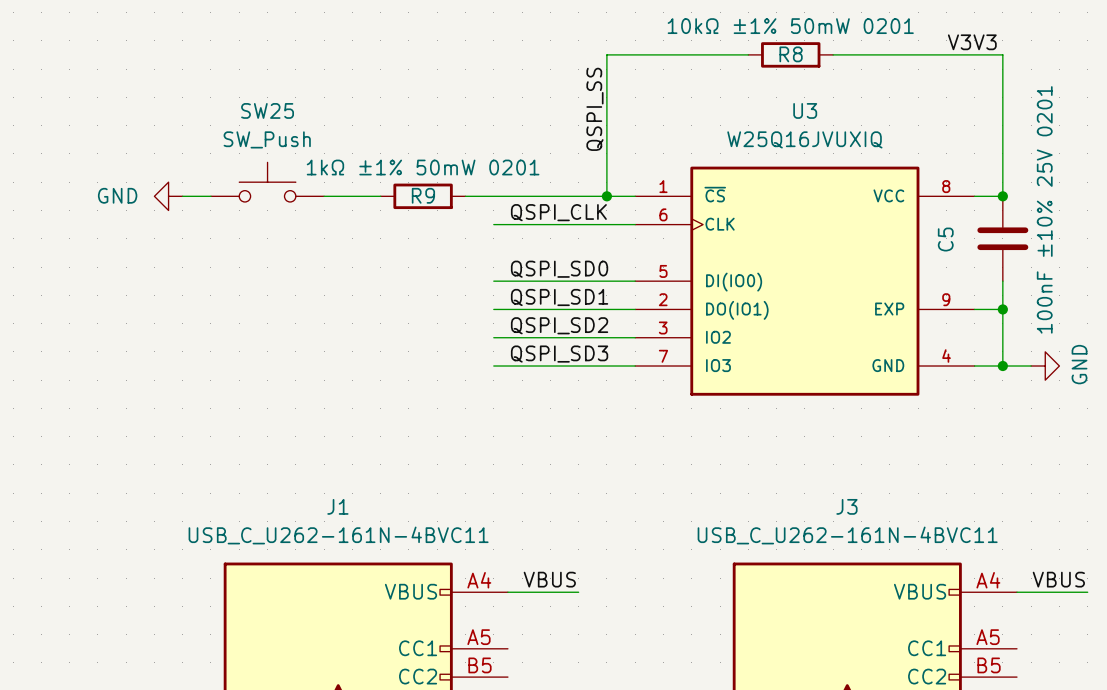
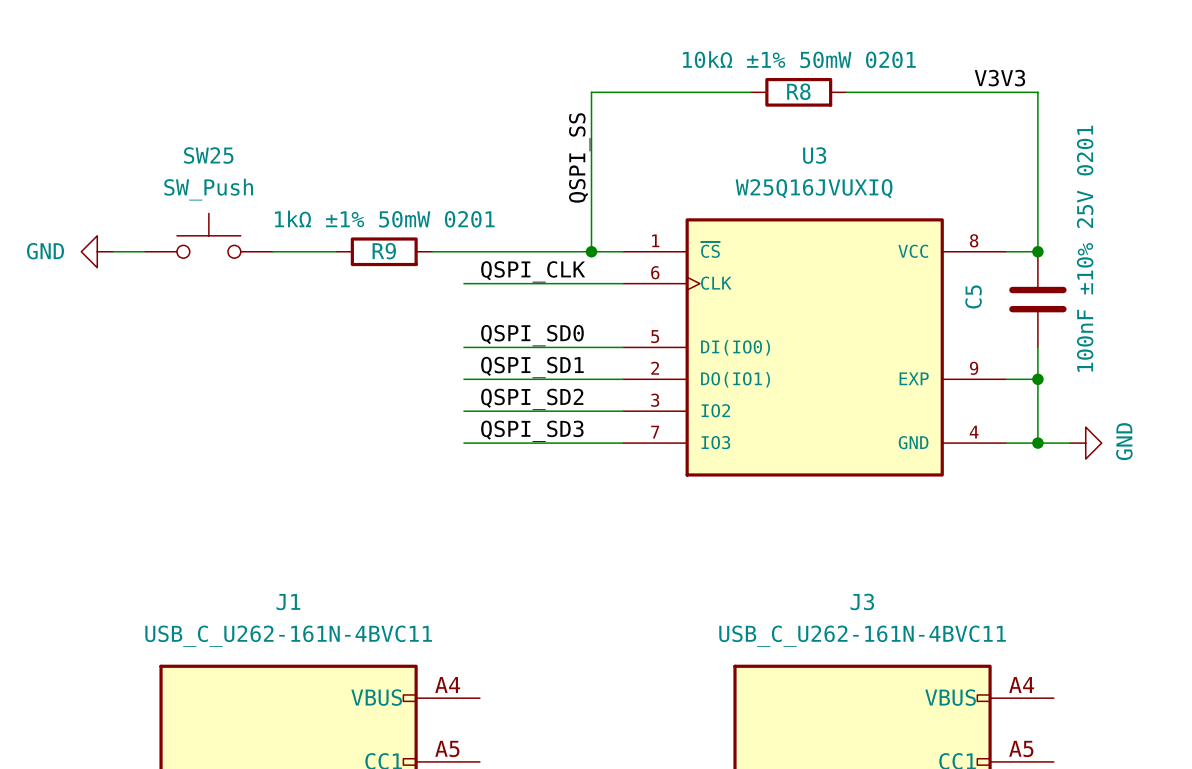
label: VBUS (549, 579) -> none
label: VBUS (1058, 579) -> none
wire: (507, 592) (578, 592) -> none
wire: (1016, 592) (1087, 592) -> none

